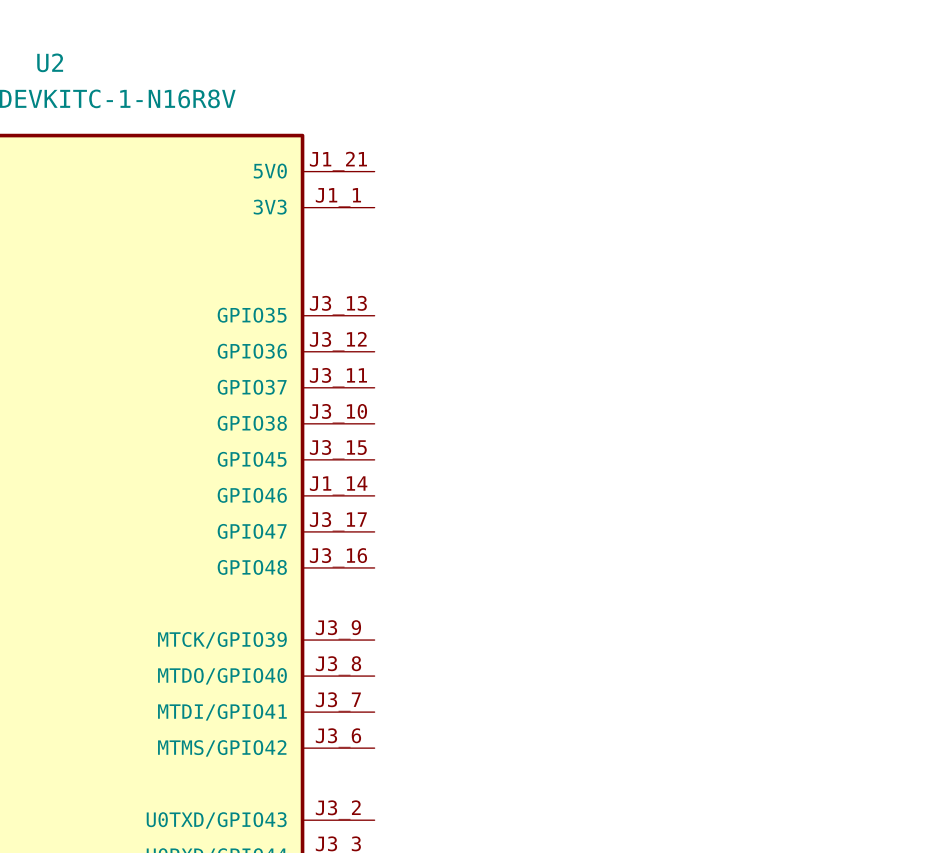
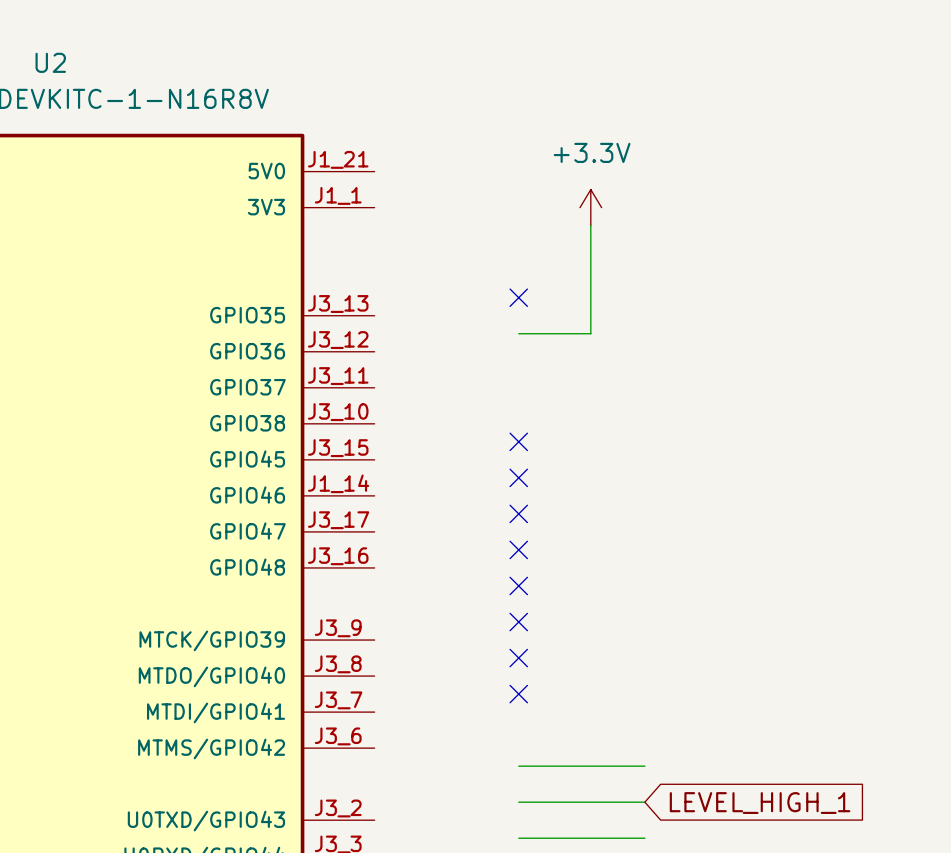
power symbol: none -> +3.3V (590, 207)
wire: none -> (590, 225) (590, 333) (518, 333)
no-connect mark: none -> (518, 297)
no-connect mark: none -> (518, 441)
no-connect mark: none -> (518, 477)
no-connect mark: none -> (518, 513)
no-connect mark: none -> (518, 549)
no-connect mark: none -> (518, 585)
no-connect mark: none -> (518, 622)
no-connect mark: none -> (518, 658)
no-connect mark: none -> (518, 694)
wire: none -> (518, 766) (644, 766)
wire: none -> (518, 802) (644, 802)
global label: none -> LEVEL_HIGH_1 (760, 803)
wire: none -> (518, 838) (644, 838)

